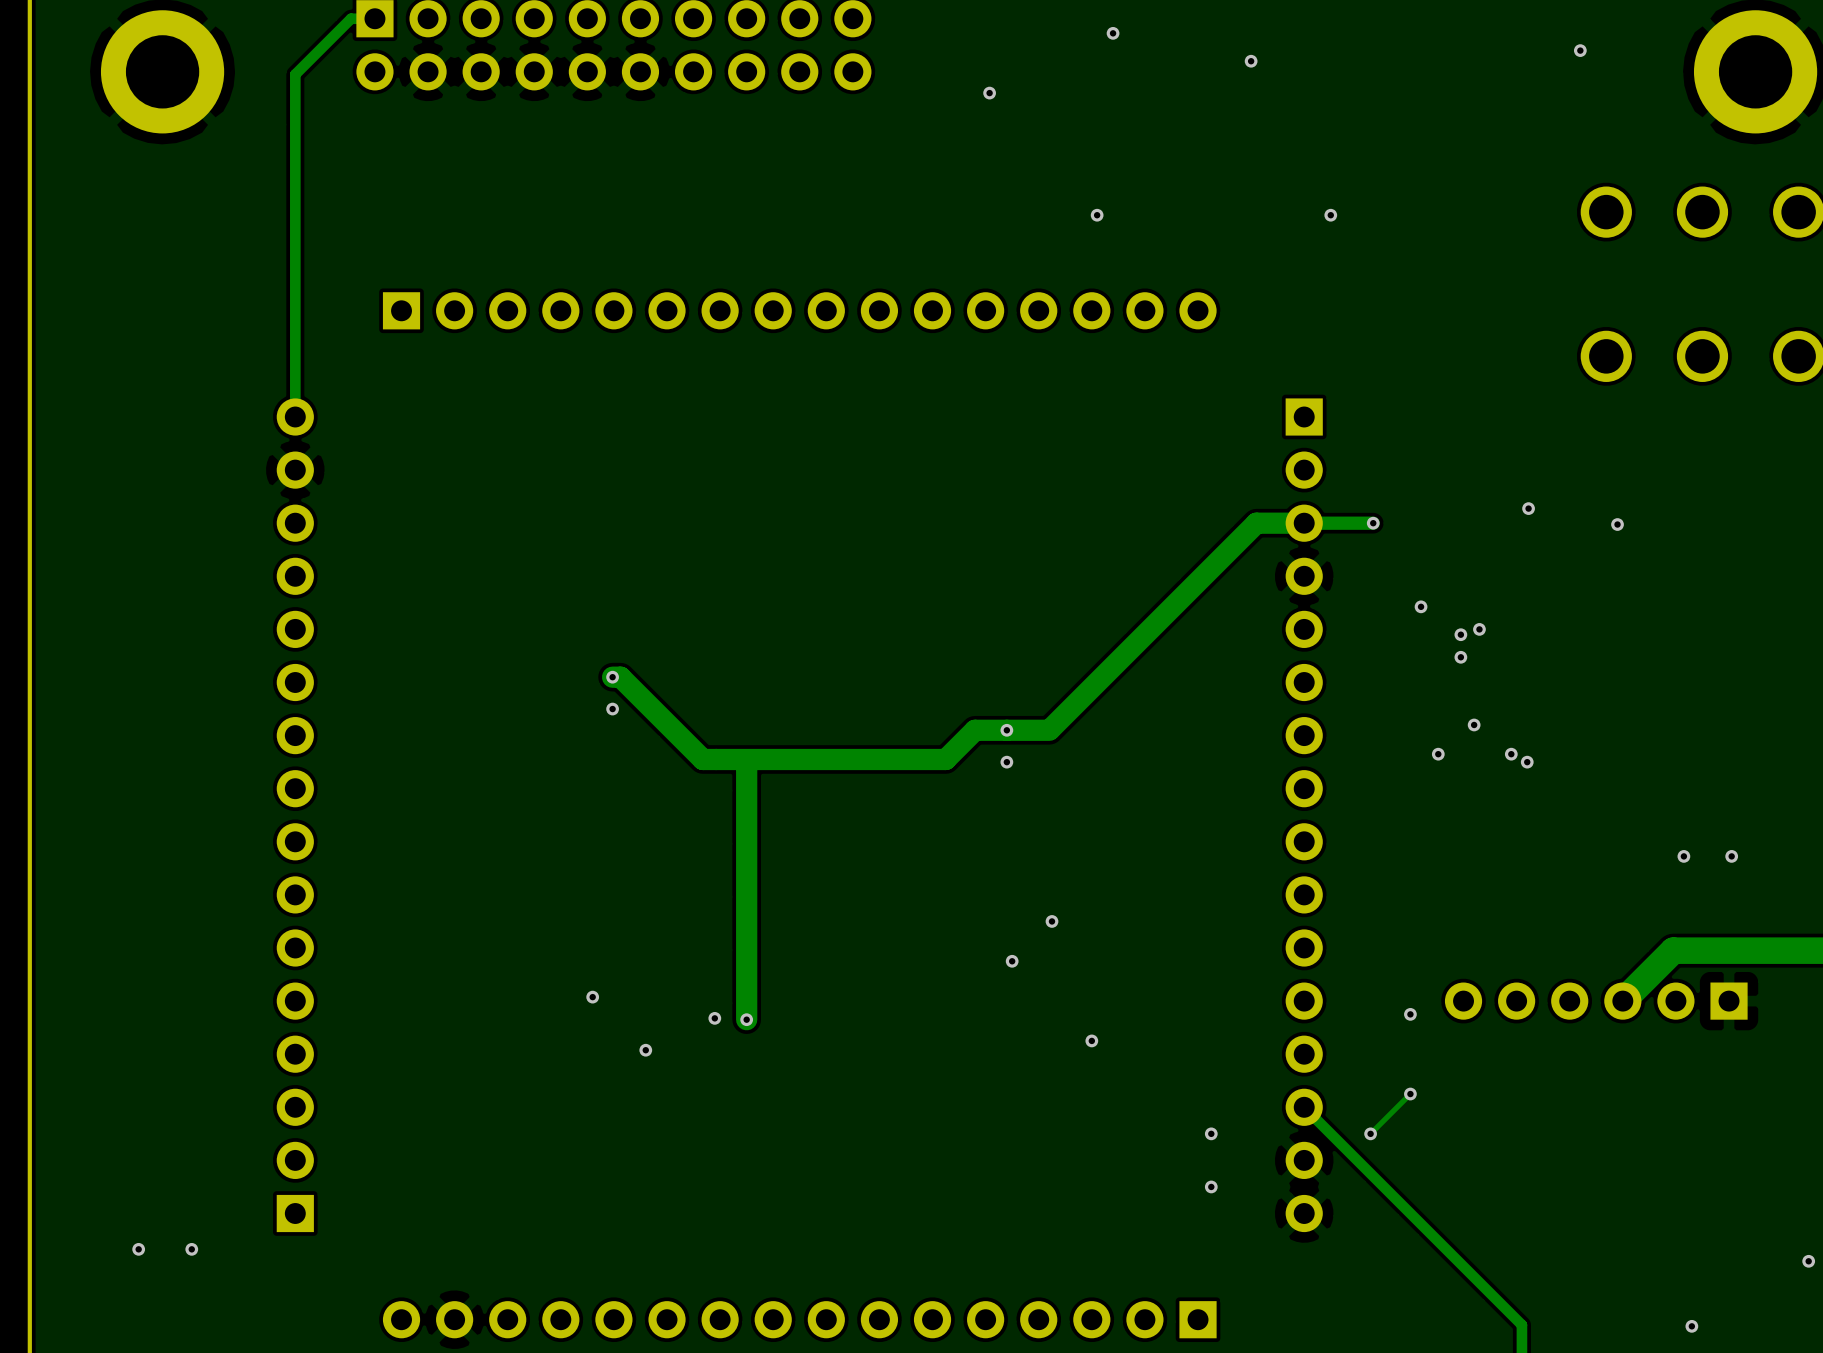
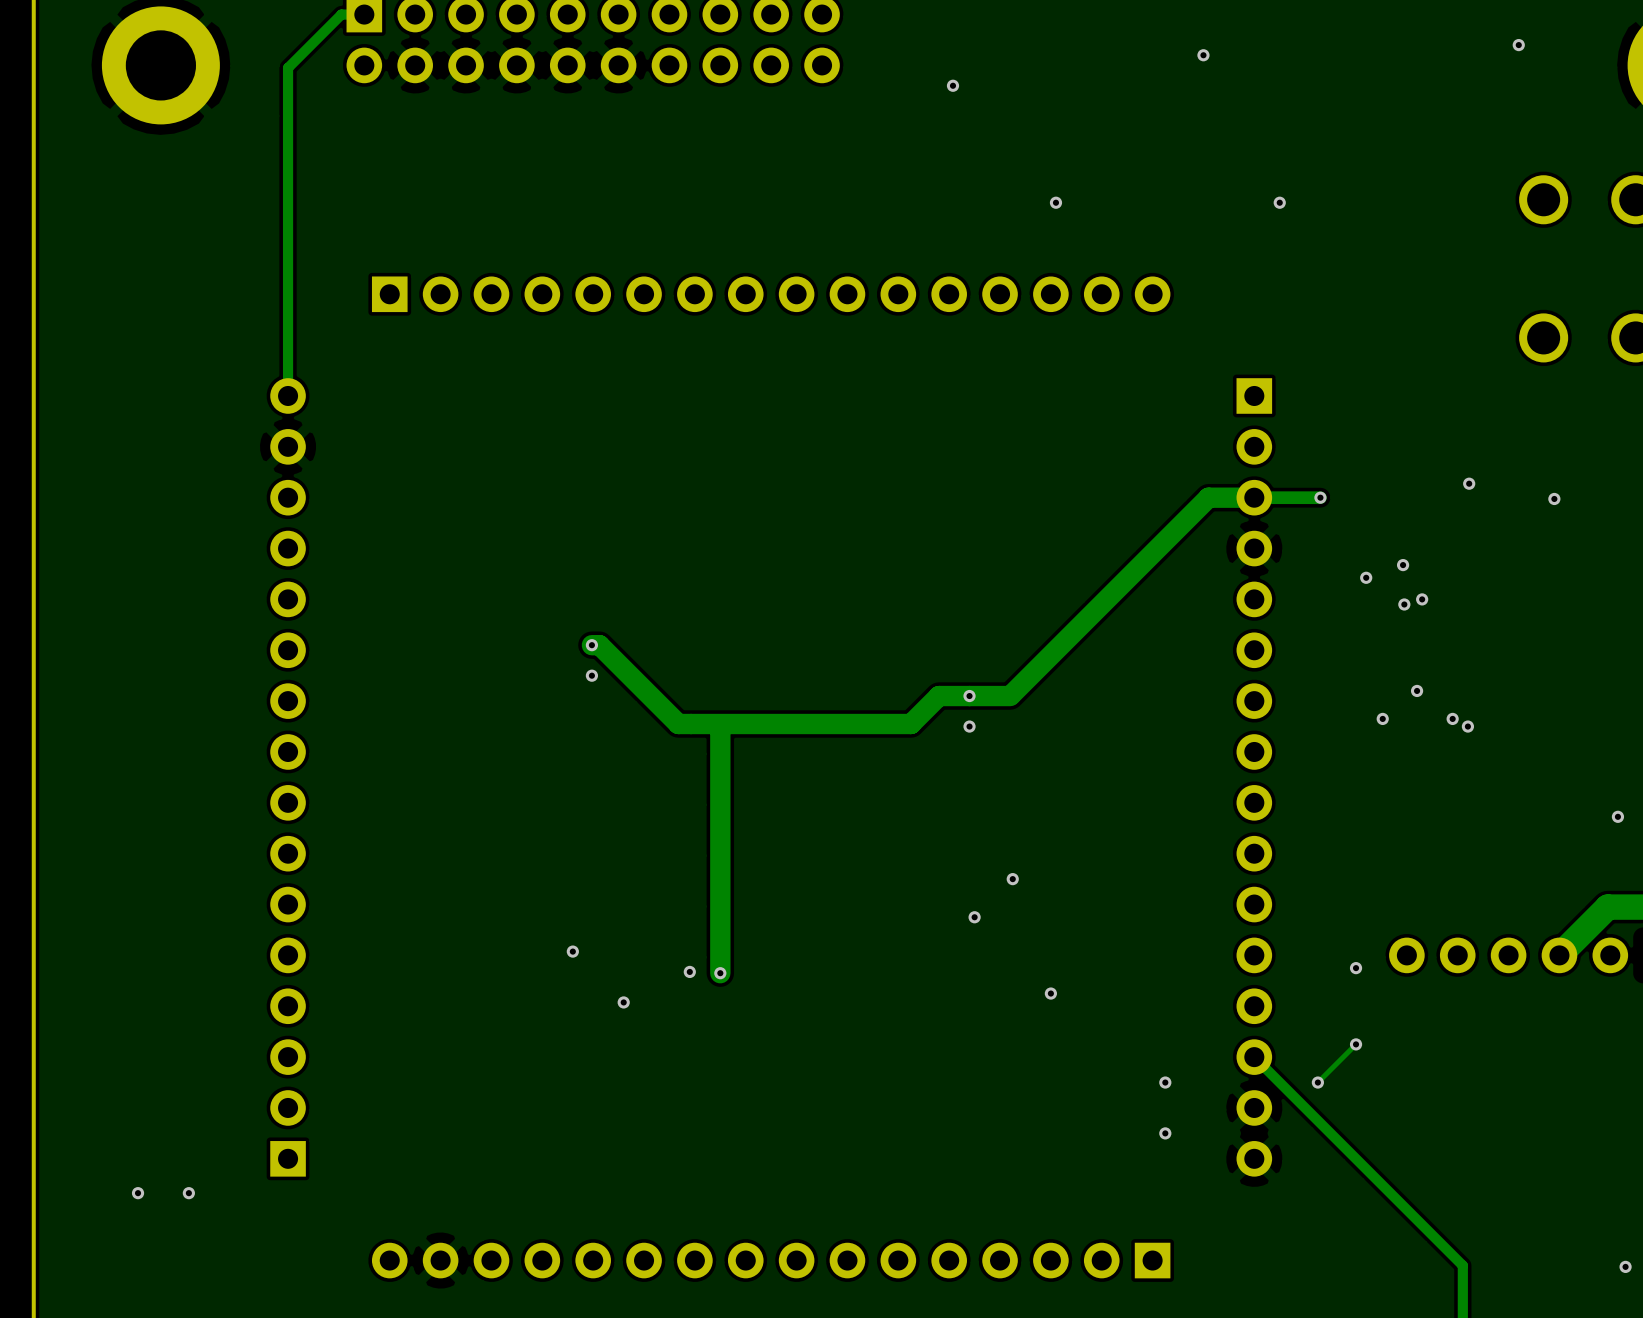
via: (1113, 33) -> none
via position: (1460, 657) -> (1403, 565)

